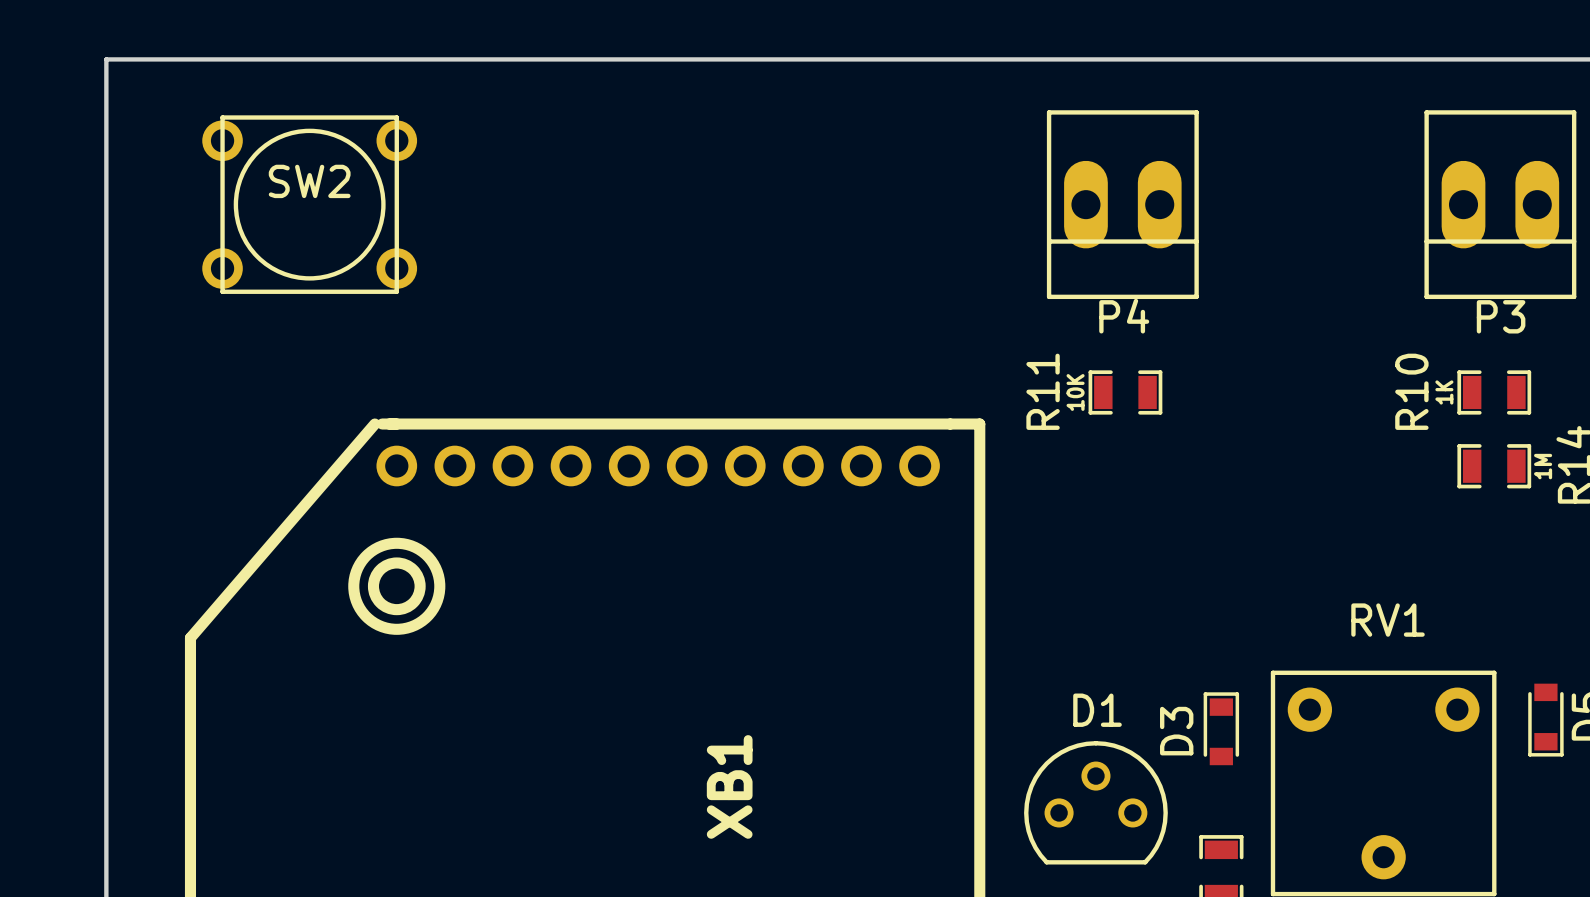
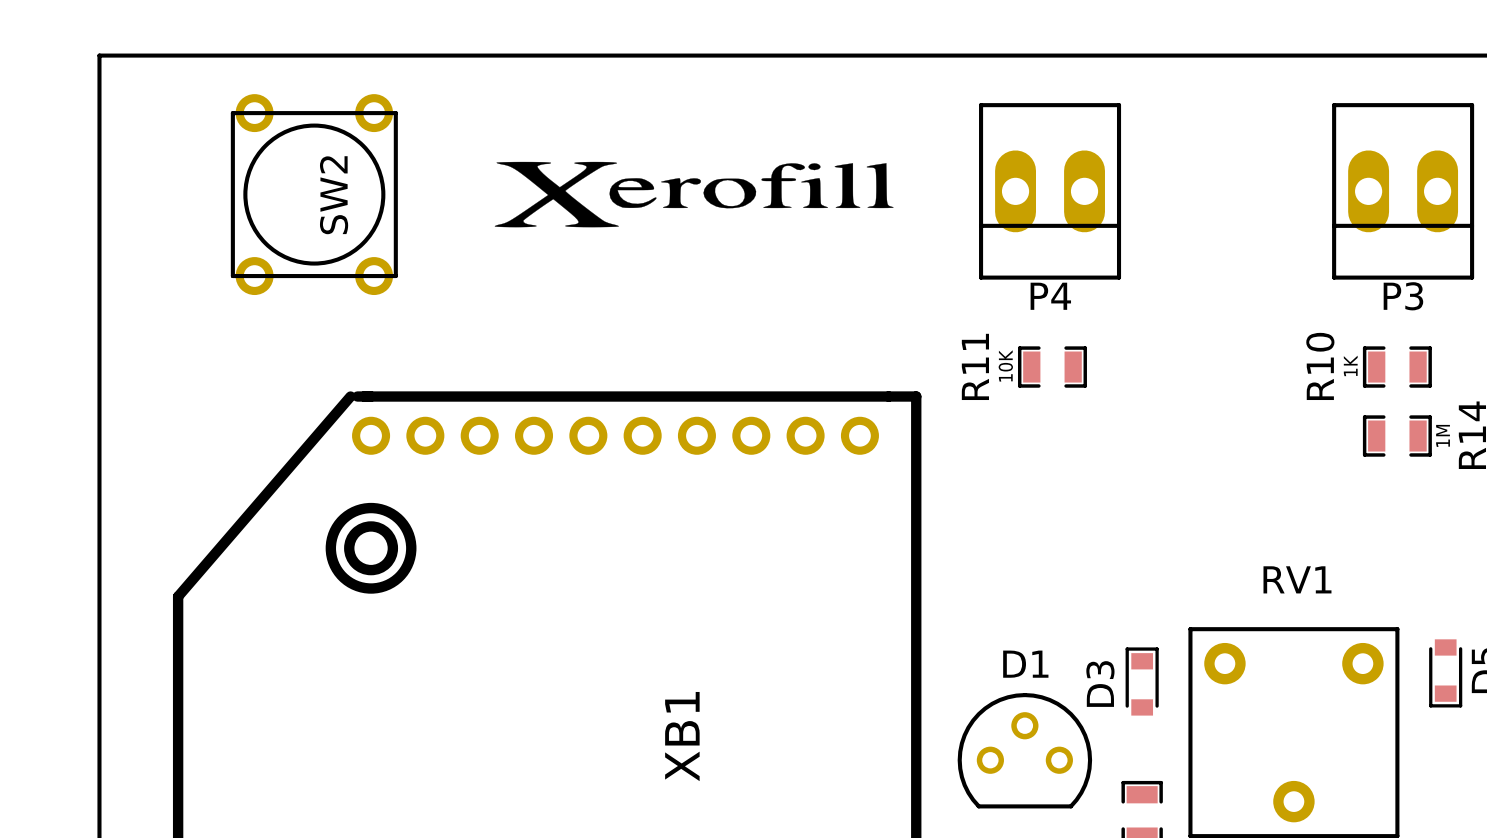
drawing: none -> [494, 161, 894, 228]
SW2 rotation: 0° (309, 204) -> 90° clockwise (314, 194)

